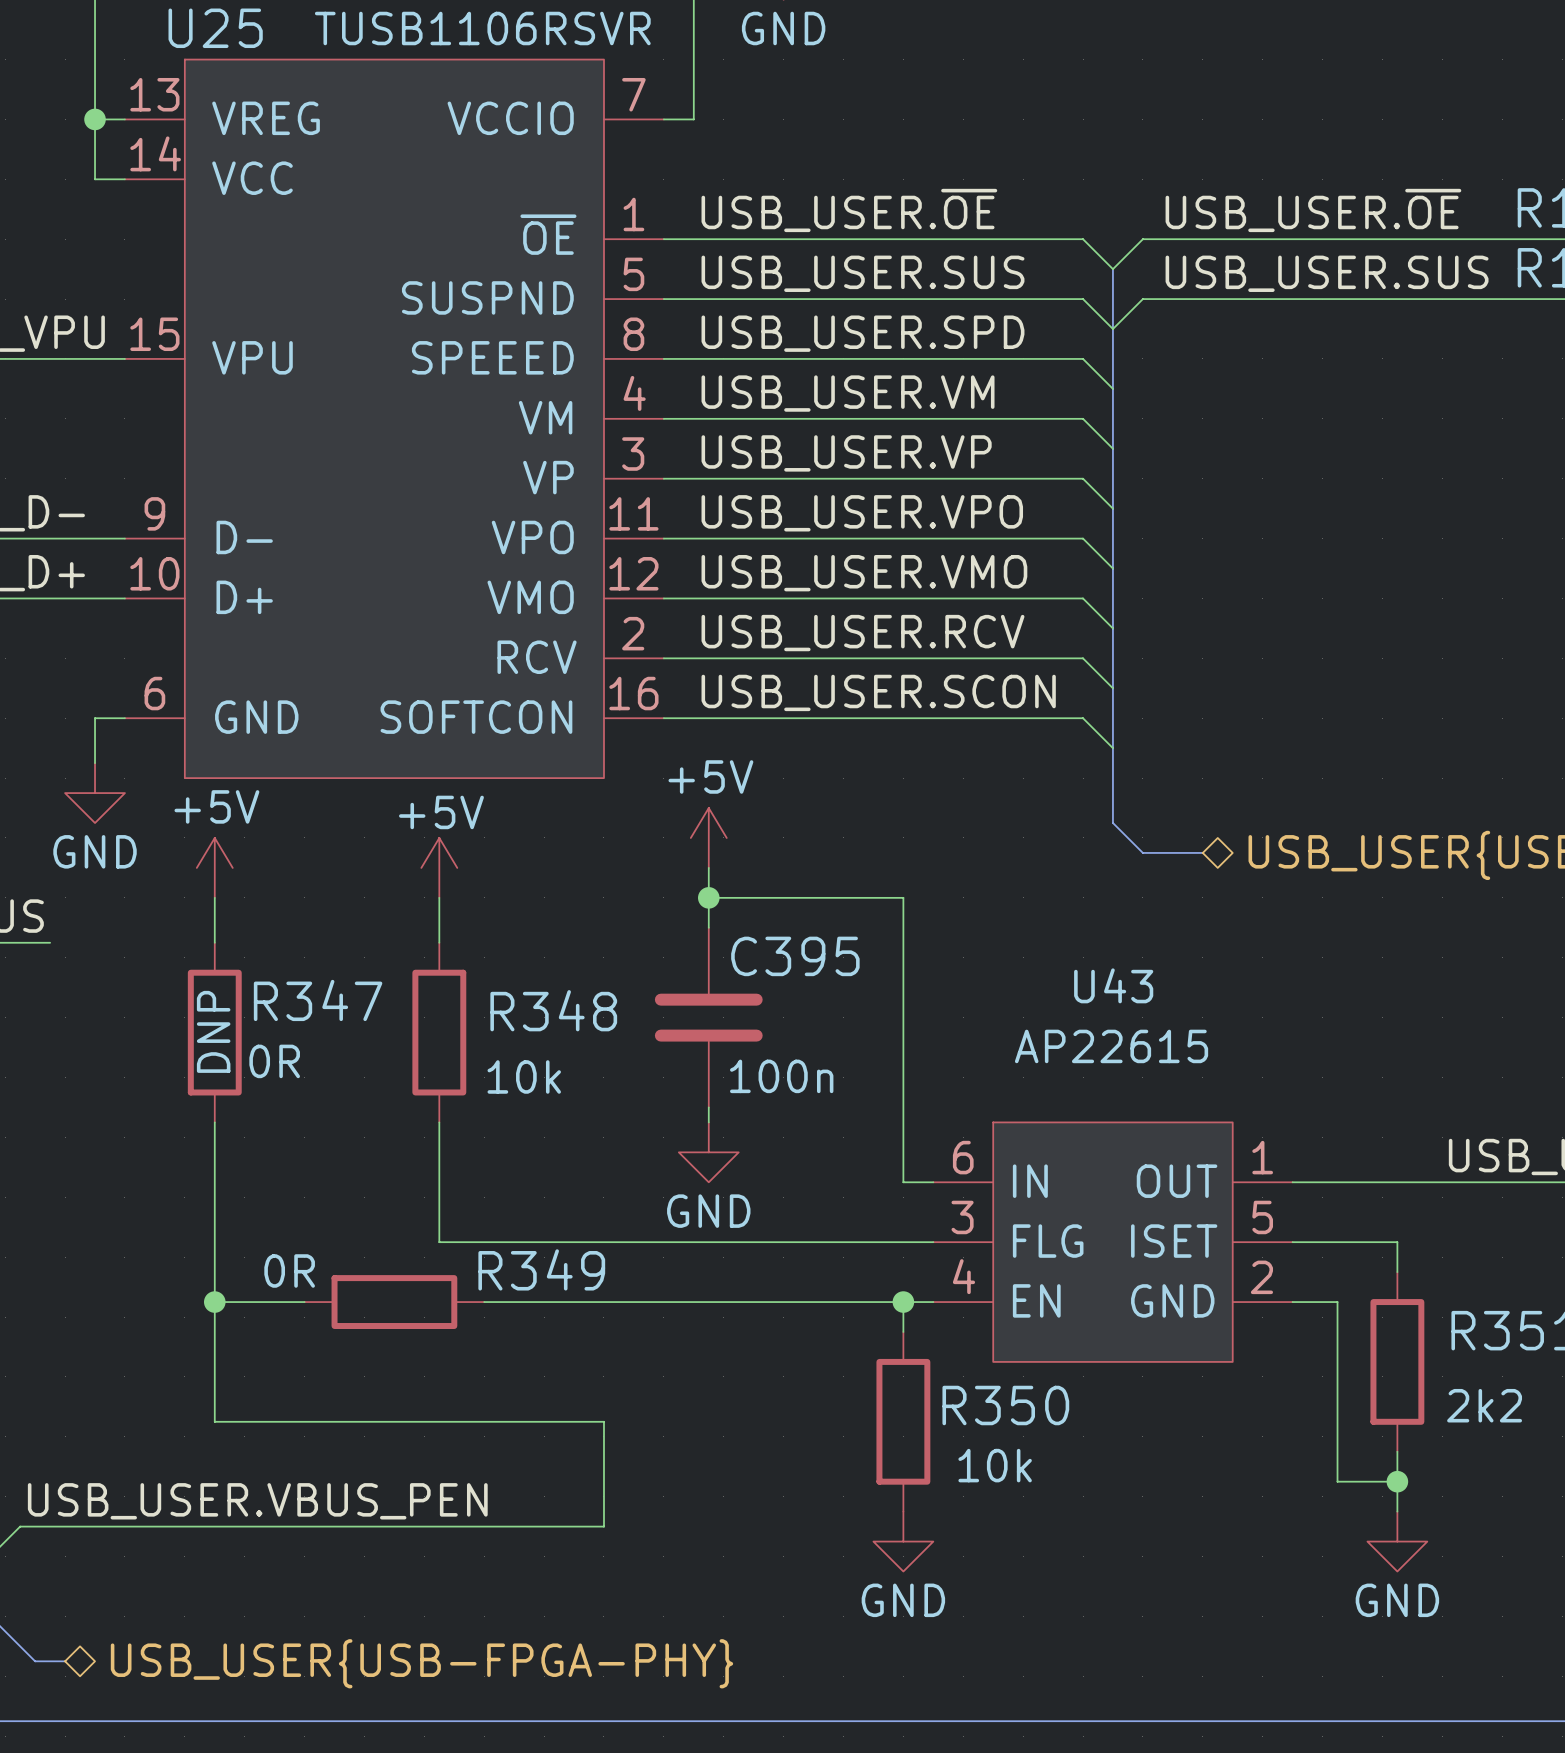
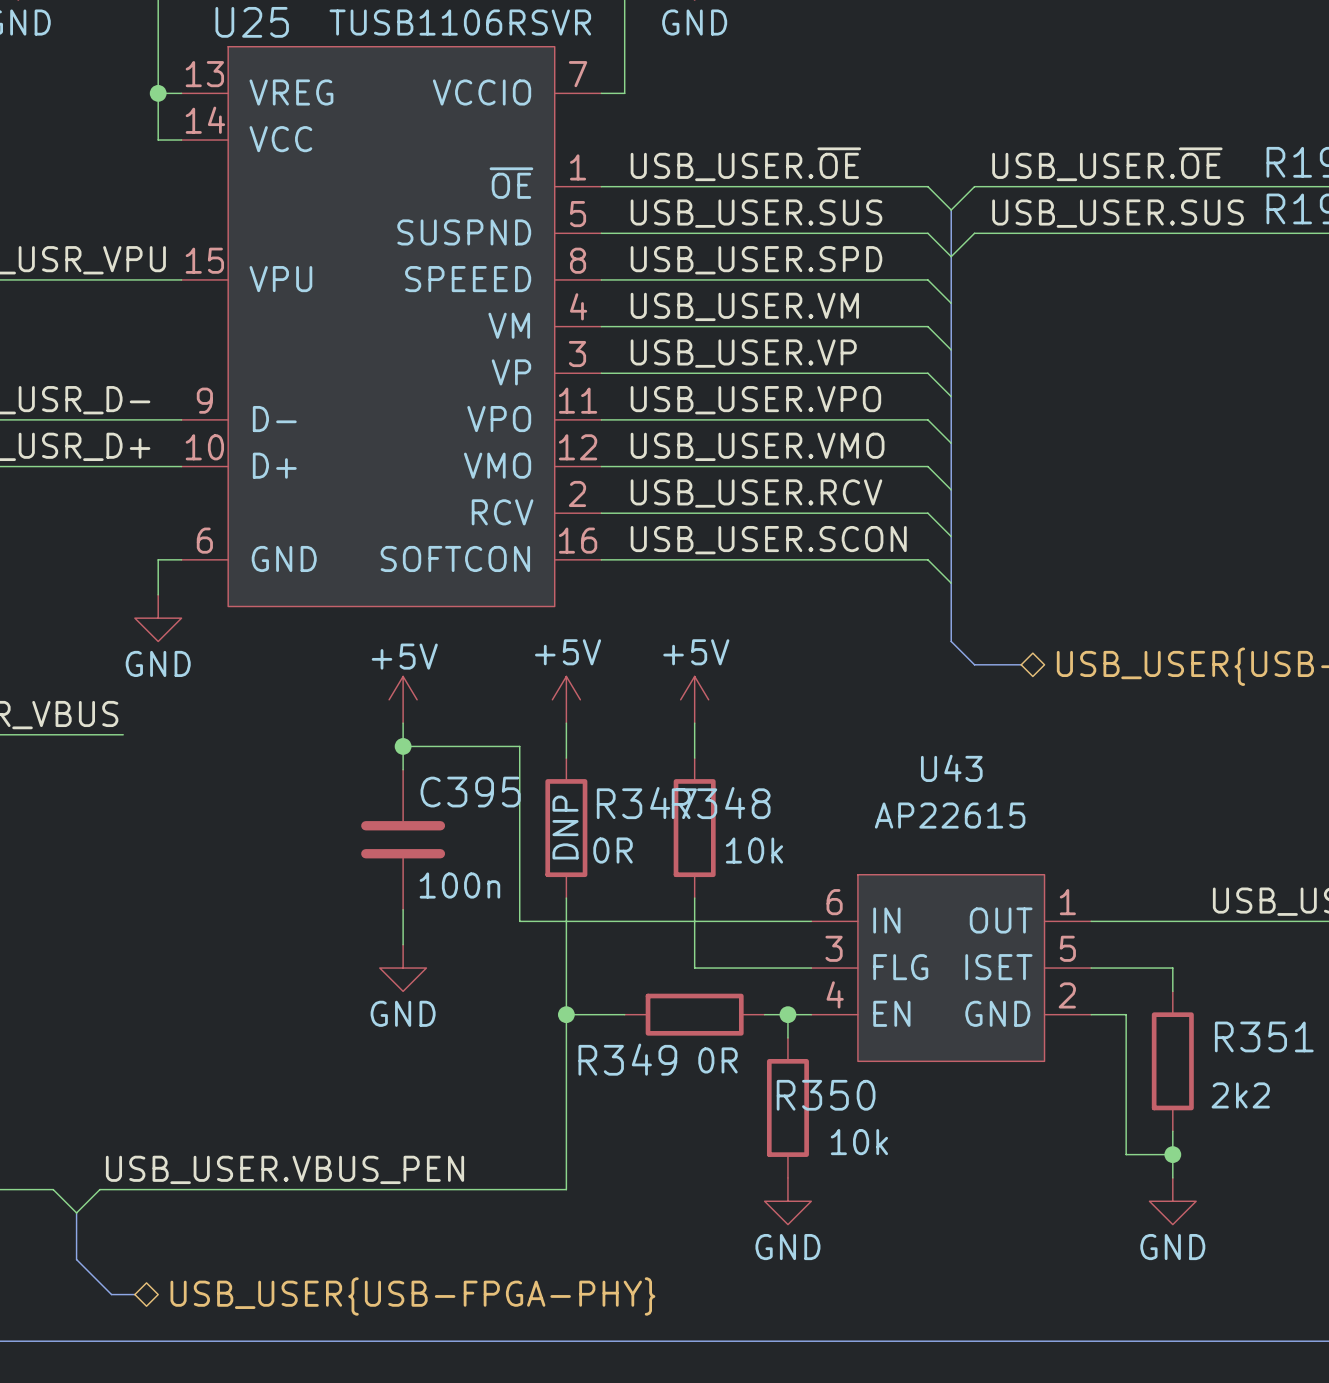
power symbol: +5V (708, 837) -> none
power symbol: +5V (214, 867) -> none
power symbol position: +5V (439, 867) -> +5V (403, 699)
wire: (708, 867) (708, 927) -> (403, 723) (403, 769)
wire: (214, 897) (214, 942) -> (403, 909) (403, 944)
wire: (439, 897) (439, 942) -> (566, 723) (566, 758)
power symbol: none -> +5V (566, 699)
wire: (708, 897) (903, 897) (903, 1182) -> (403, 746) (519, 746) (519, 921) (787, 921)
junction: (708, 897) -> none
power symbol: none -> +5V (694, 699)
wire: none -> (694, 723) (694, 758)
junction: none -> (403, 746)
R348 name position: R348 (553, 1010) -> R348 (721, 803)
C395 position: (708, 1017) -> (403, 839)
R347 position: (214, 1032) -> (566, 828)
R348 position: (439, 1032) -> (694, 828)
R348 text position: 10k (524, 1076) -> 10k (754, 850)
wire: (708, 1107) (708, 1122) -> none
wire: (214, 1122) (214, 1421) (603, 1421) (603, 1526) -> (566, 898) (566, 1189) (554, 1189)
wire: (439, 1122) (439, 1242) (783, 1242) -> (694, 898) (694, 968)
power symbol position: GND (708, 1152) -> GND (403, 968)
R349 name position: R349 (541, 1269) -> R349 (627, 1059)
R349 text position: 0R (289, 1270) -> 0R (717, 1060)
wire: (214, 1302) (304, 1302) -> none
junction: (214, 1302) -> none
R349 position: (394, 1302) -> (694, 1014)
wire: (484, 1302) (618, 1302) -> none
junction: none -> (566, 1014)
wire: (693, 1302) (873, 1302) -> none
R350 name position: R350 (1005, 1405) -> R350 (826, 1095)

